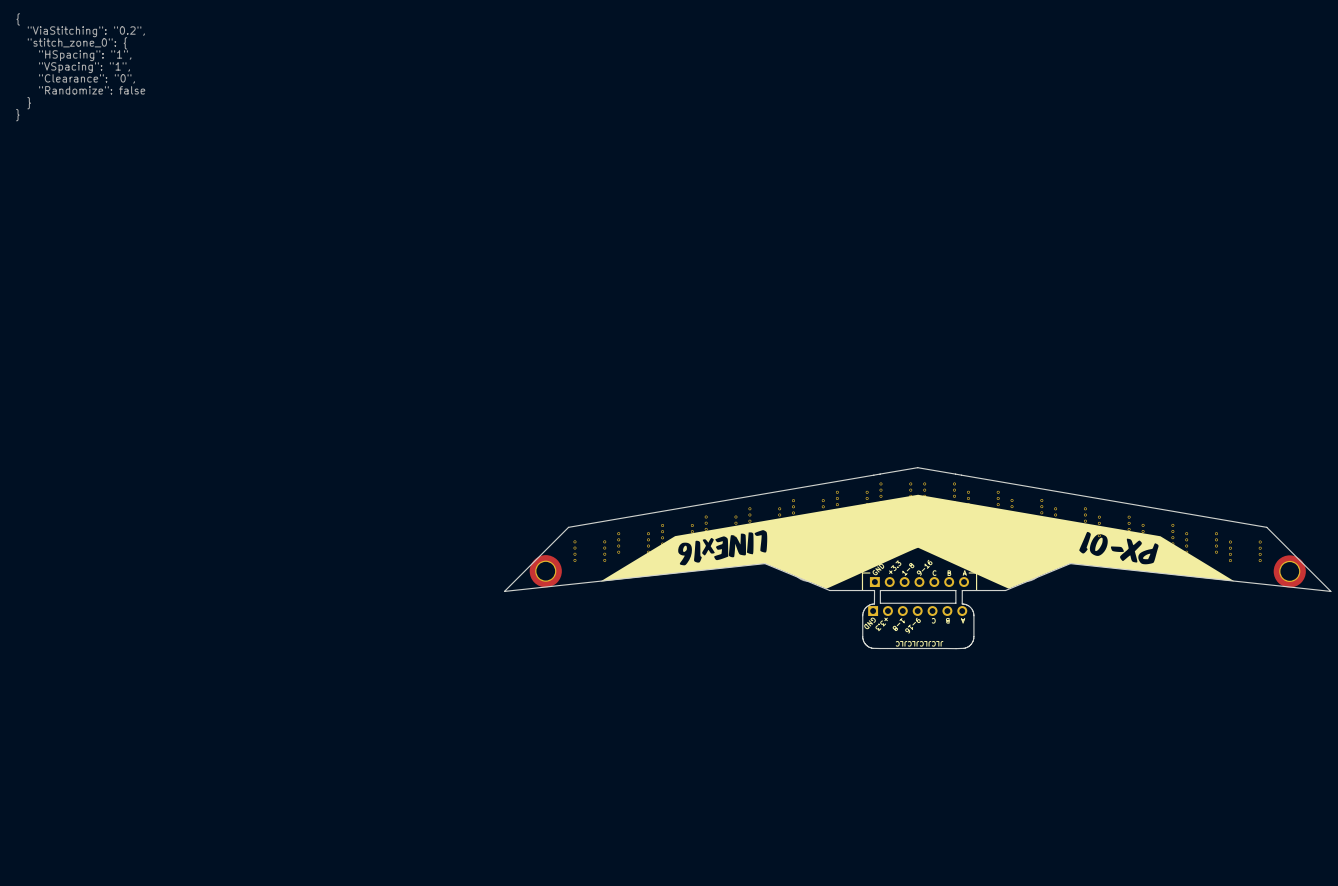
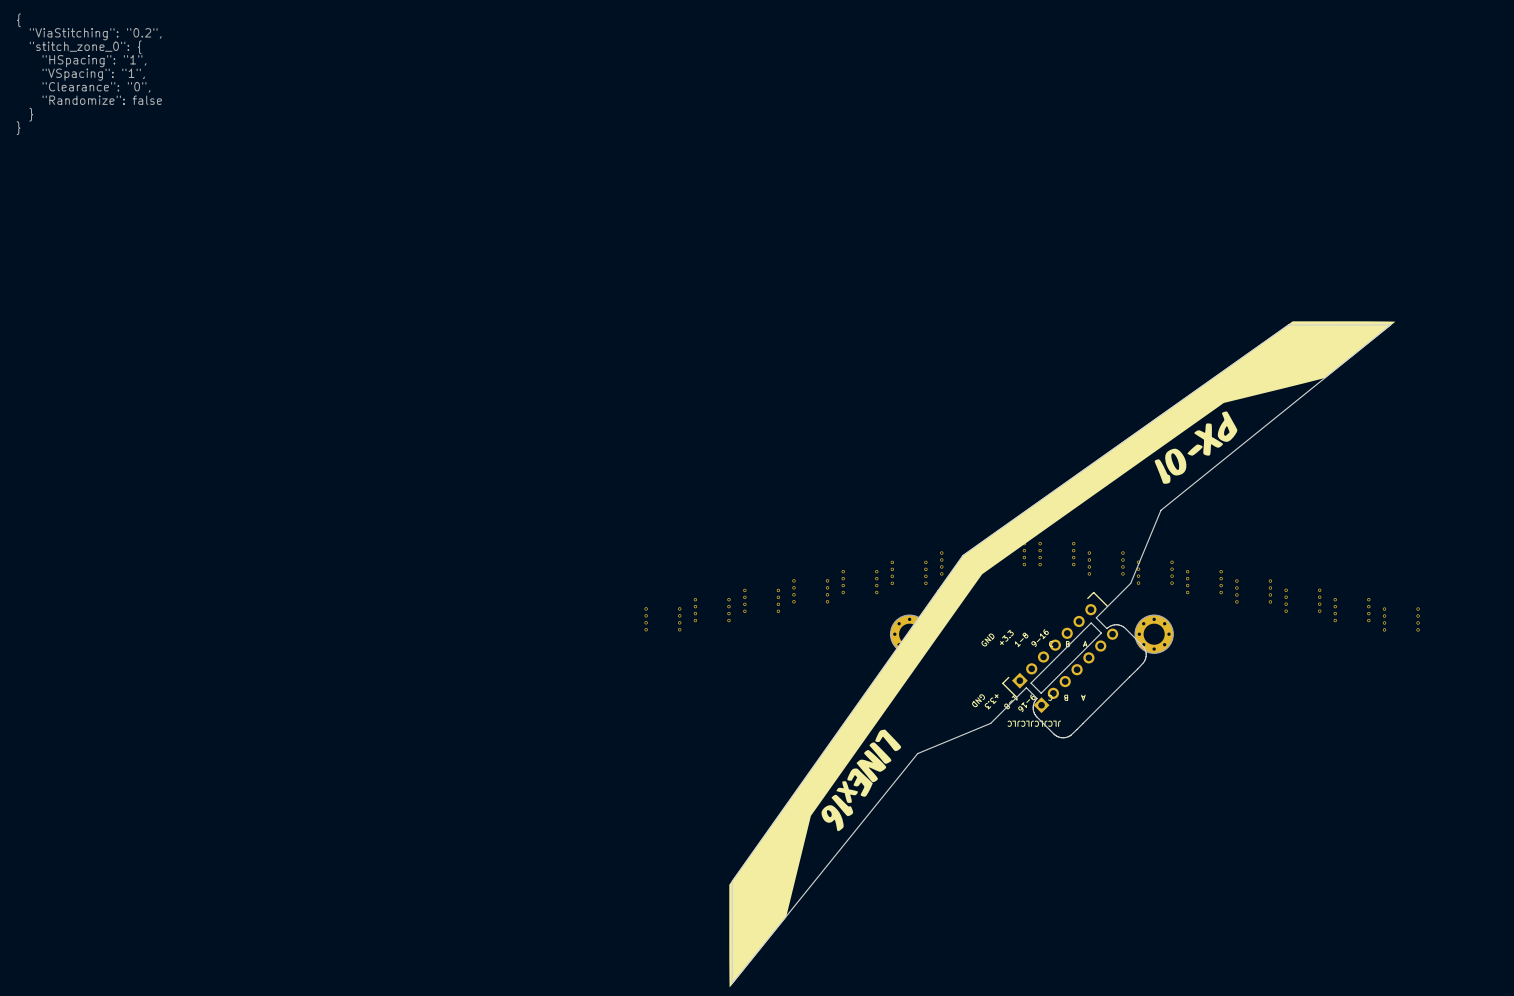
drawing: none -> [729, 321, 1396, 988]
board edge: none -> (1288, 324) (1390, 324) (1160, 510) (1130, 583) (1096, 617) (1106, 628) (1116, 624) (1125, 628) (1144, 648) (1146, 654) (1143, 662) (1068, 736) (1056, 736) (1035, 715) (1033, 707) (1037, 698) (1026, 687) (990, 723) (917, 753) (732, 983) (732, 881) (962, 555) (1288, 324)
board edge: (917, 467) (568, 527) (504, 591) (764, 563) (829, 590) (874, 590) (874, 603) (866, 607) (862, 614) (863, 639) (869, 647) (956, 648) (968, 646) (973, 638) (973, 612) (969, 606) (962, 603) (962, 590) (1005, 590) (1070, 563) (1330, 591) (1266, 527) (917, 467) -> none
drawing: [600, 494, 1235, 589] -> none
line: none -> (1087, 598) (1093, 592) (1107, 606)
board edge: none -> (1091, 622) (1031, 683) (1041, 693) (1101, 633) (1091, 622)
part: (545, 571) -> none
part: (1289, 571) -> none
line: (869, 573) (862, 573) (862, 590) -> none
line: (969, 573) (976, 573) (976, 590) -> none
part: none -> (1054, 646)
part: (919, 582) -> none
board edge: (880, 590) (955, 590) (955, 603) (880, 603) (880, 590) -> none
part: none -> (1075, 670)
line: none -> (1008, 677) (1002, 683) (1016, 697)
part: (917, 611) -> none

